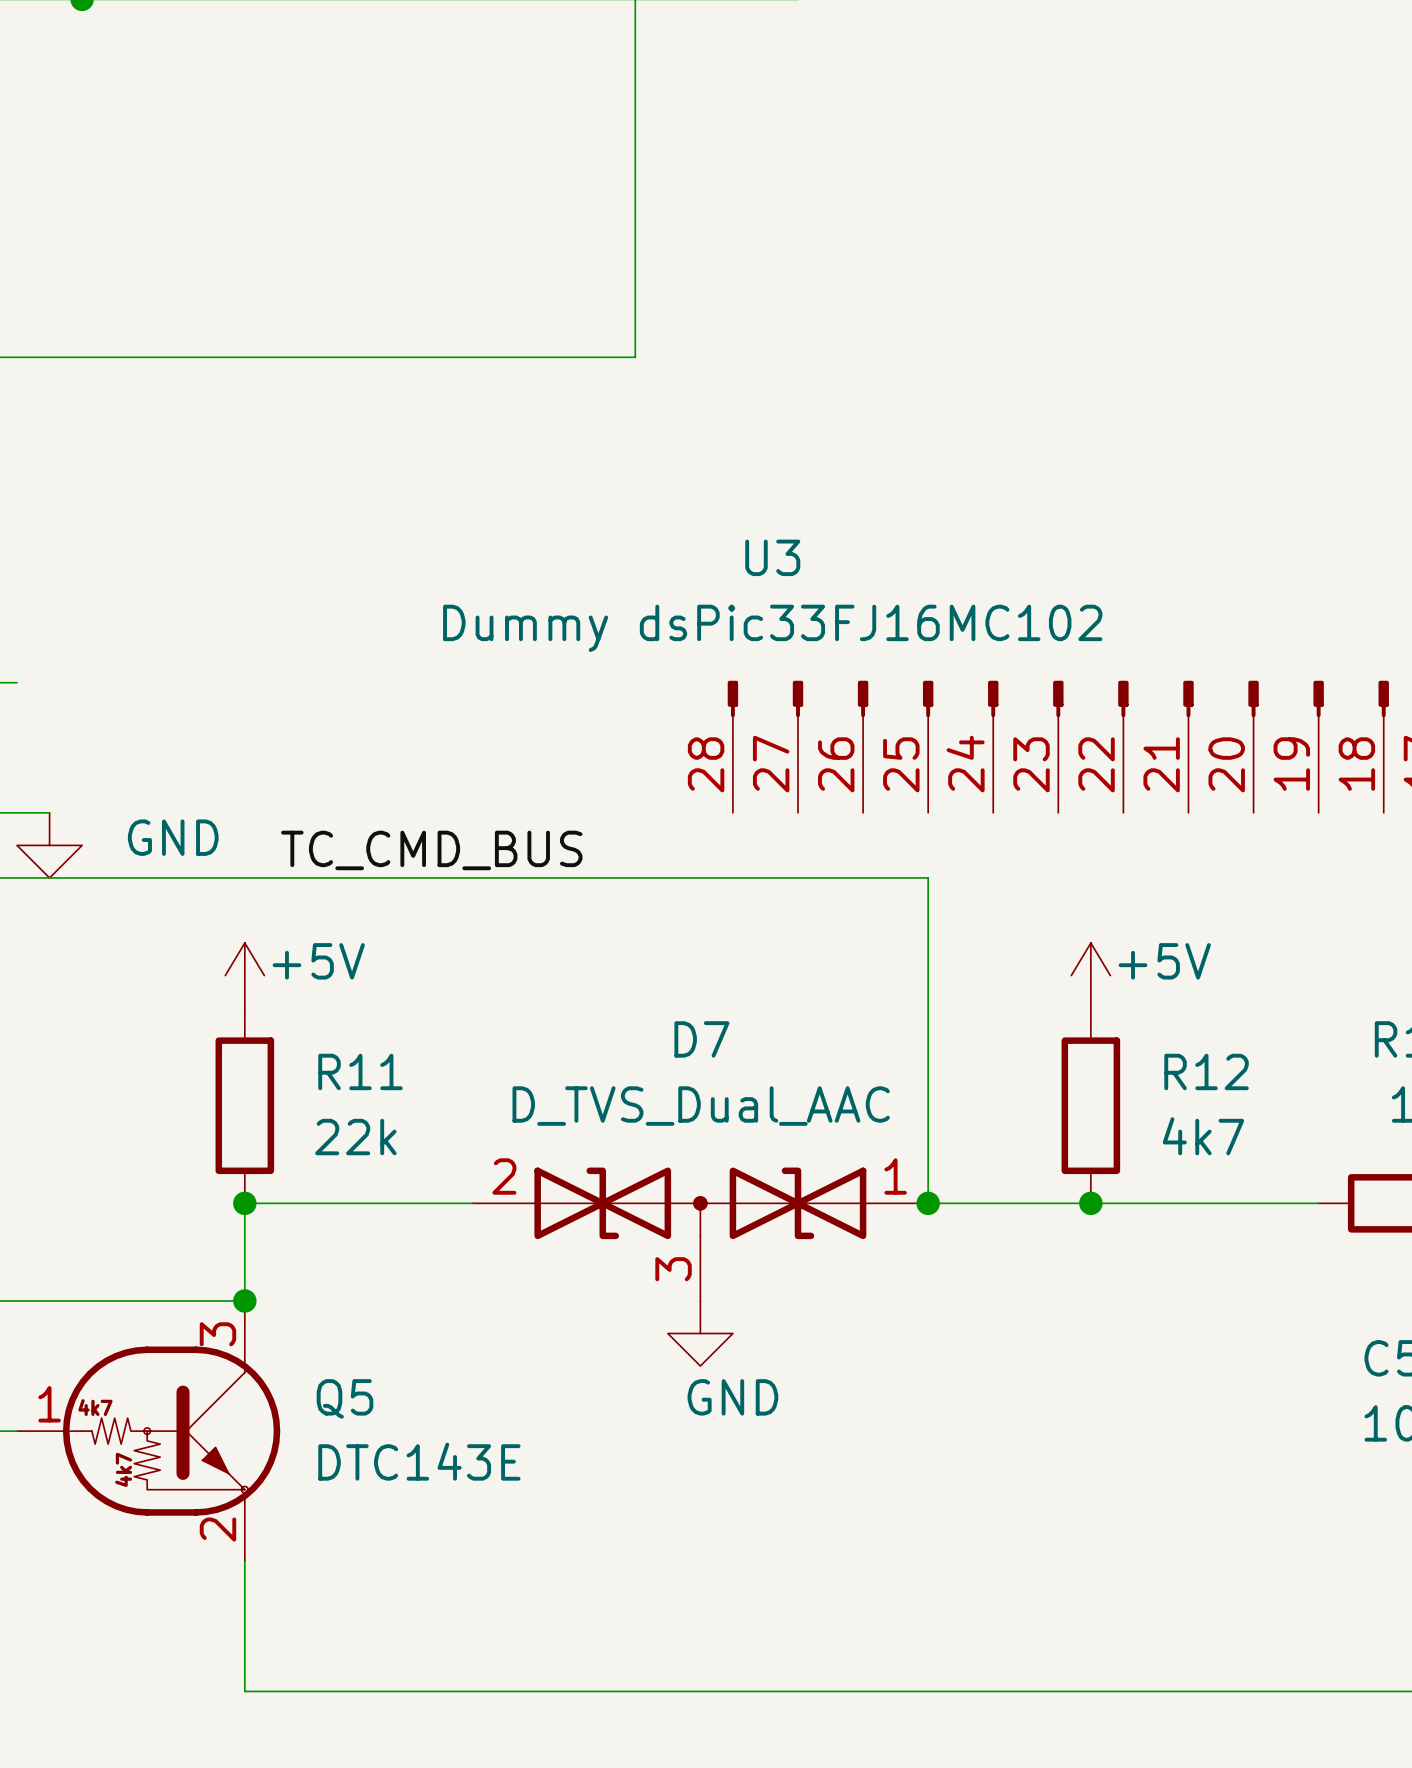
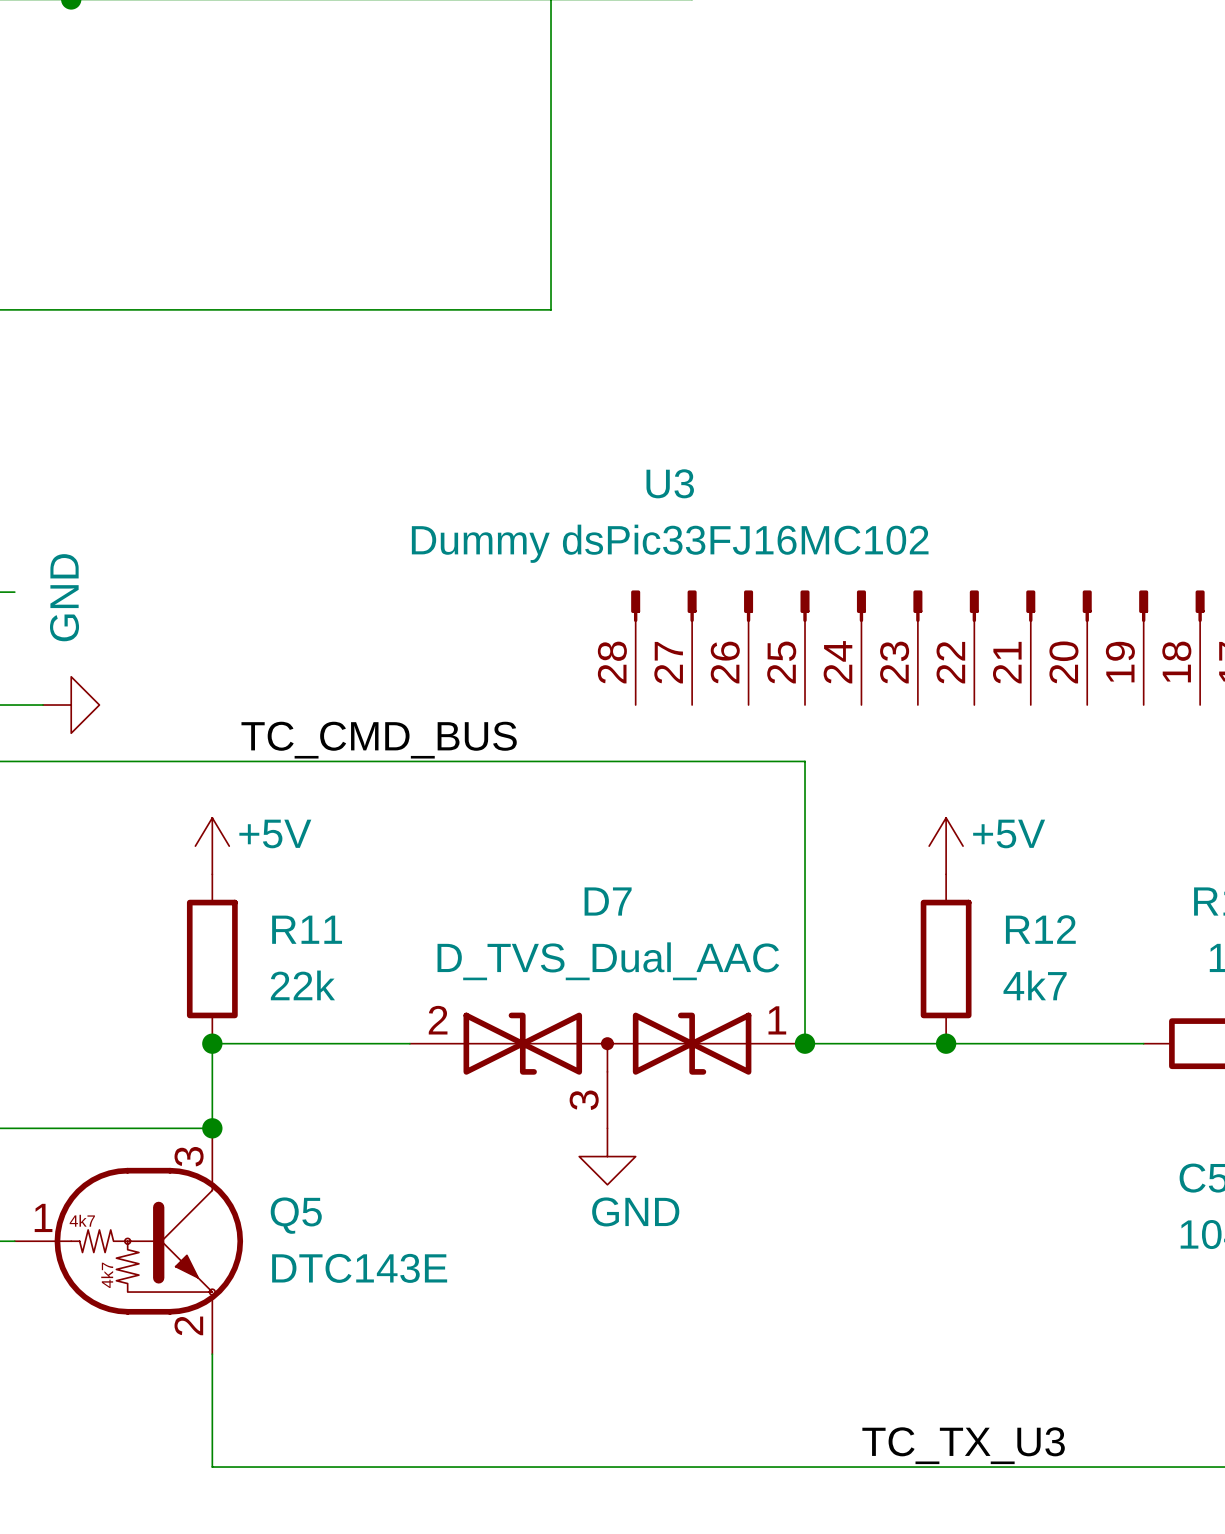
power symbol rotation: 0° (49, 845) -> 90° counterclockwise (71, 705)
power symbol position: GND (49, 845) -> GND (71, 705)
label: none -> TC_TX_U3 (963, 1445)

